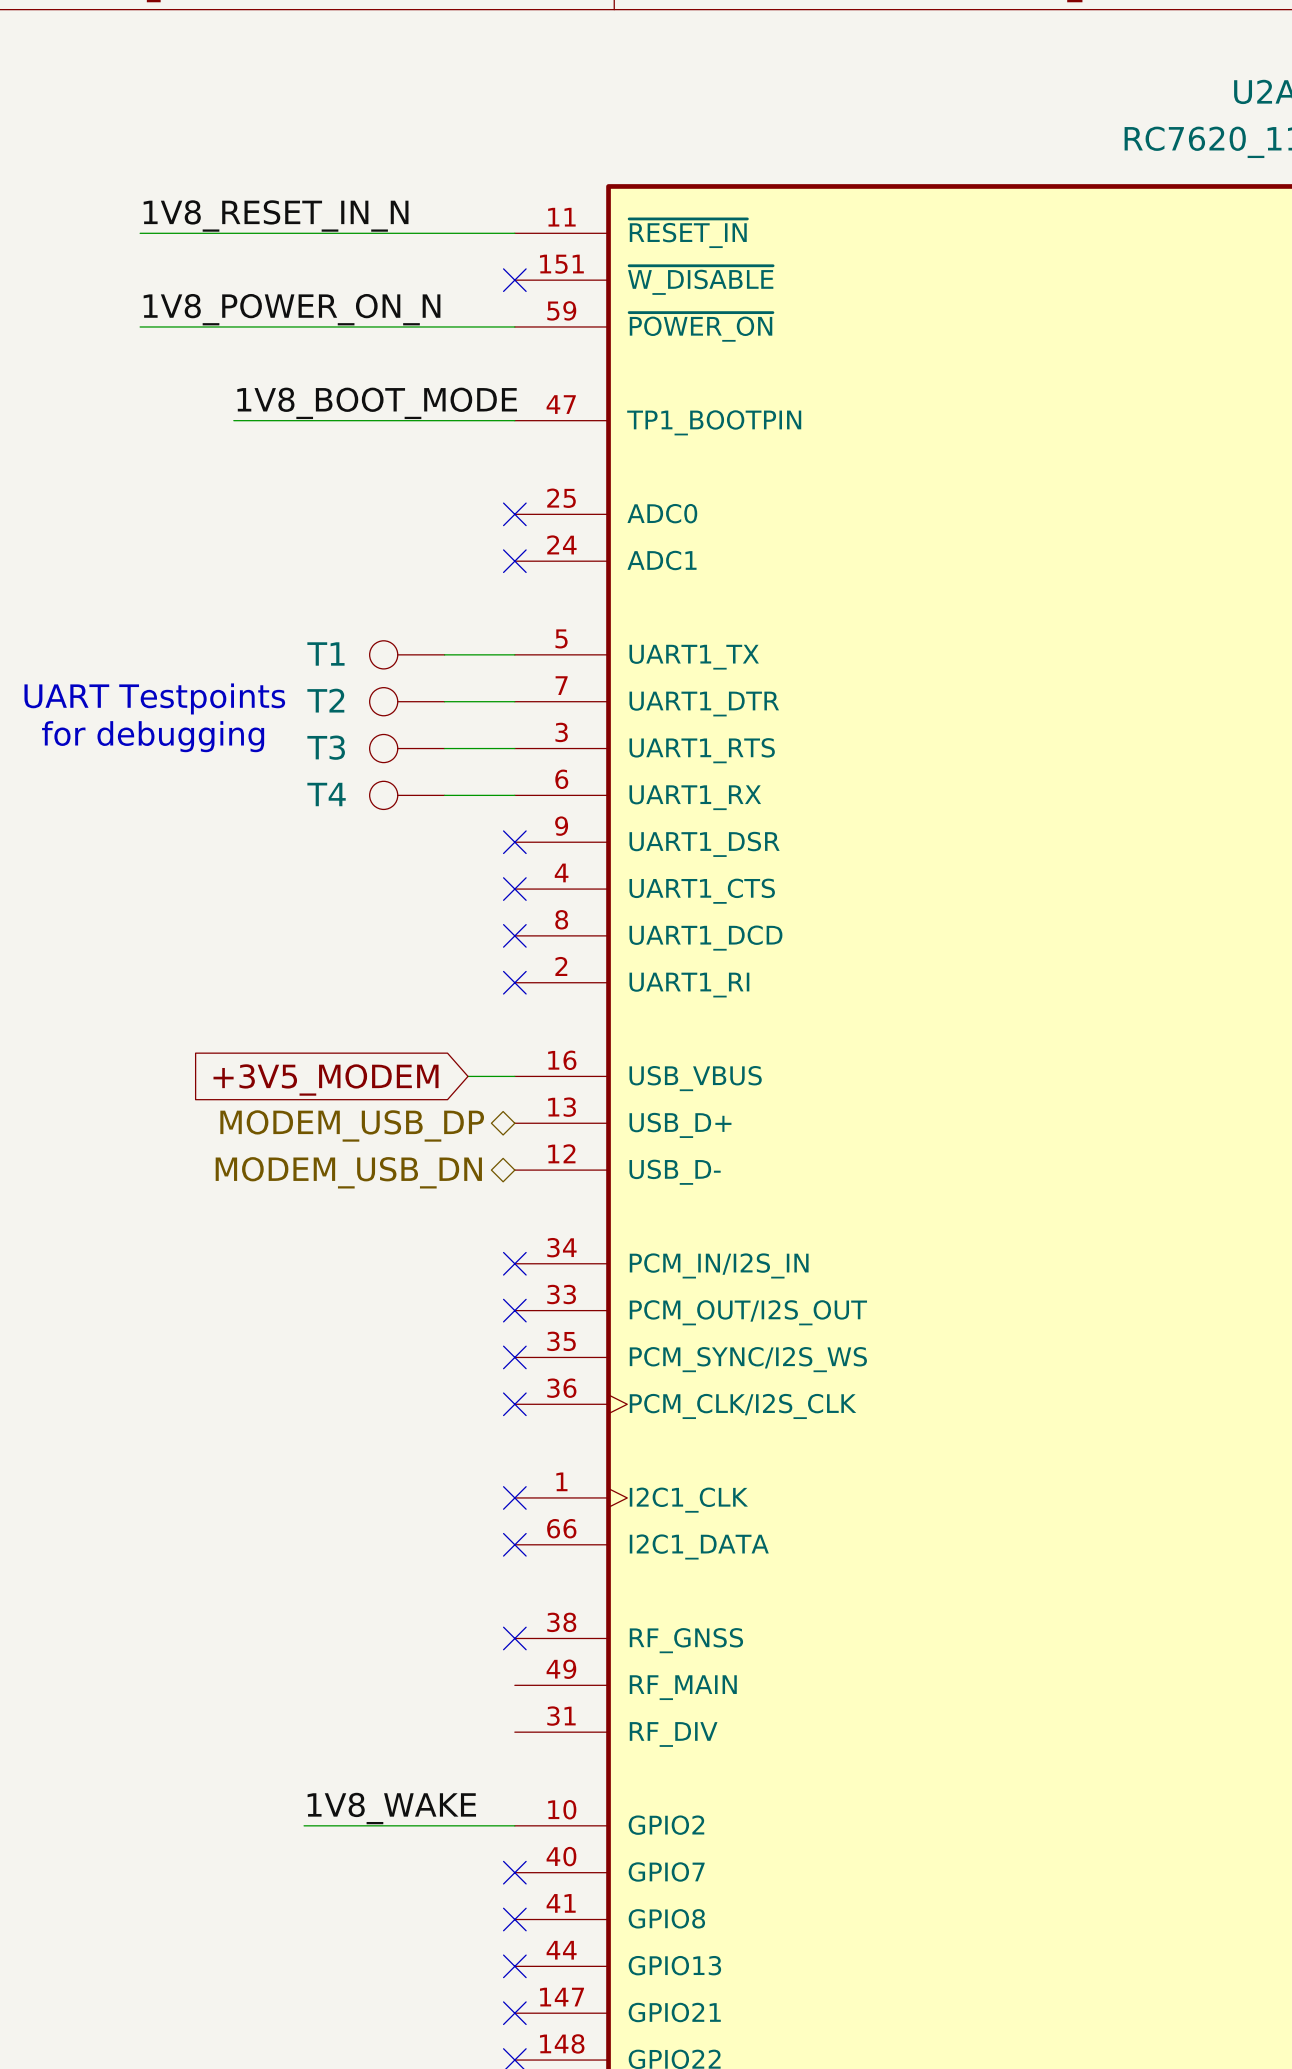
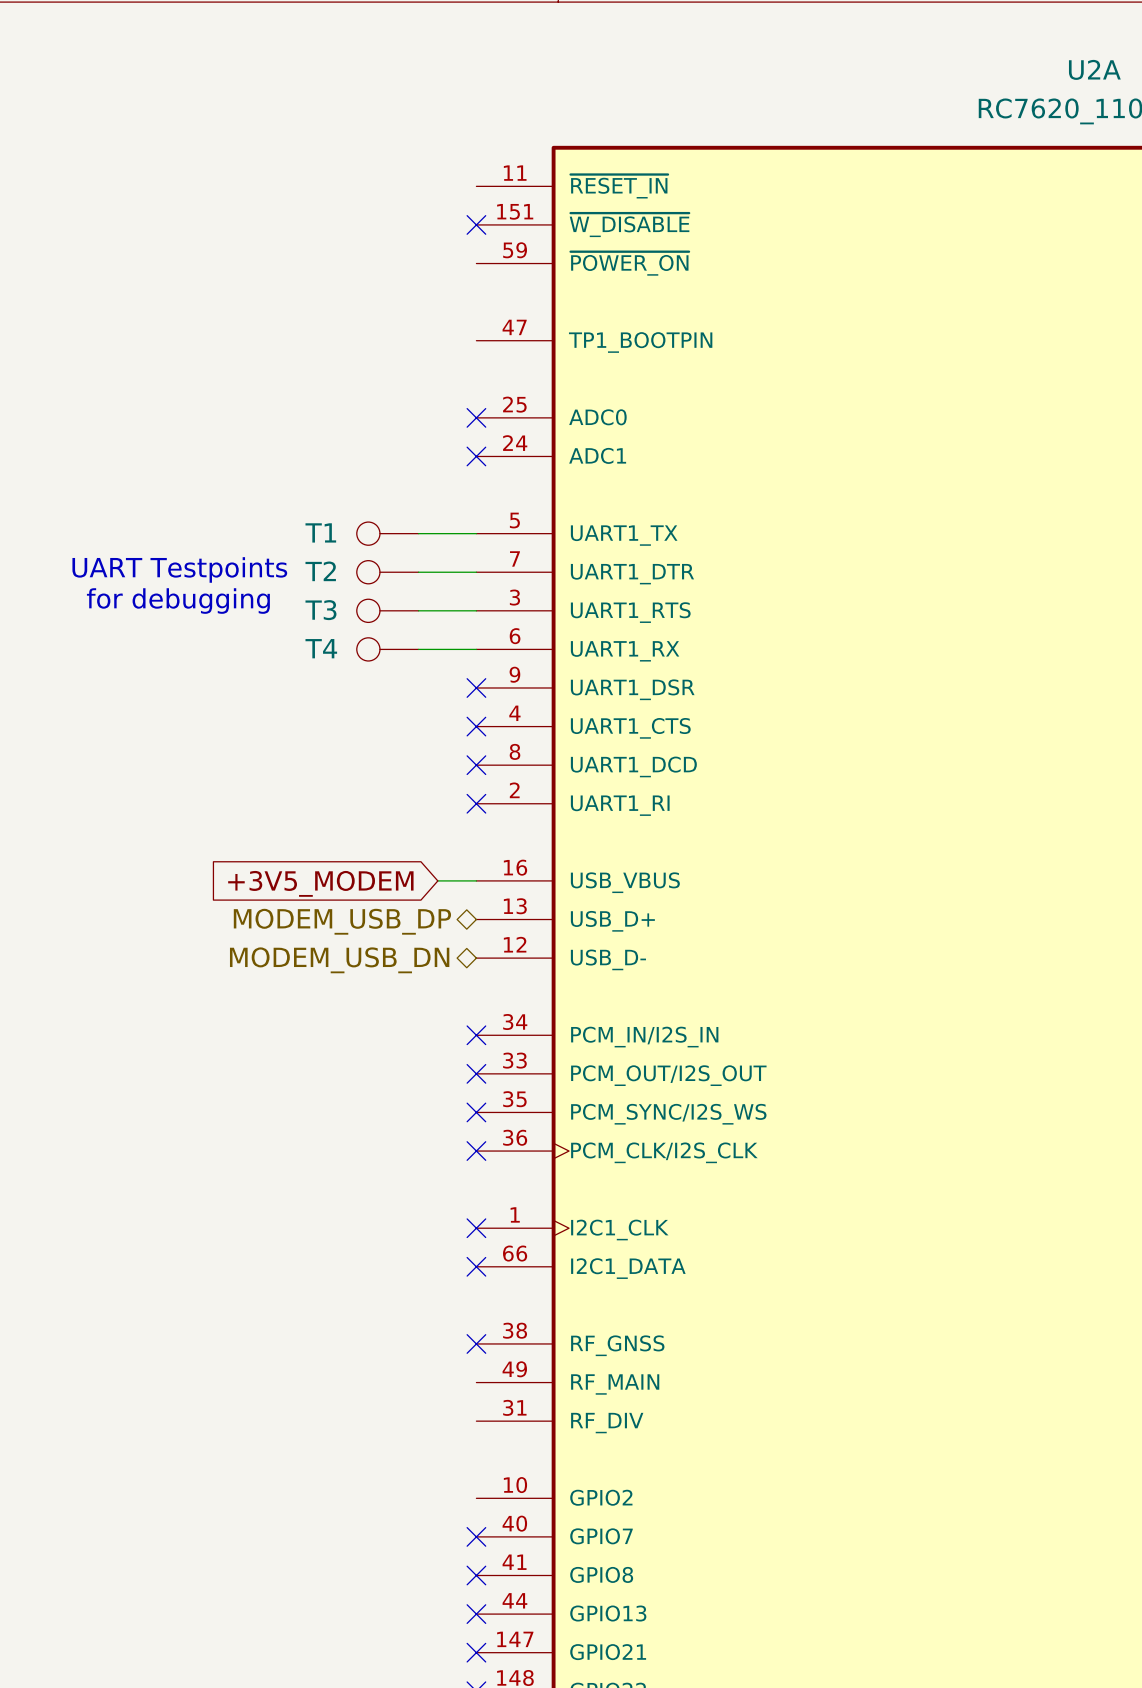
label: 1V8_RESET_IN_N (276, 215) -> none
wire: (140, 233) (514, 233) -> none
label: 1V8_POWER_ON_N (292, 309) -> none
wire: (140, 326) (514, 326) -> none
label: 1V8_BOOT_MODE (377, 403) -> none
wire: (233, 420) (514, 420) -> none
label: 1V8_WAKE (391, 1808) -> none
wire: (304, 1825) (514, 1825) -> none

